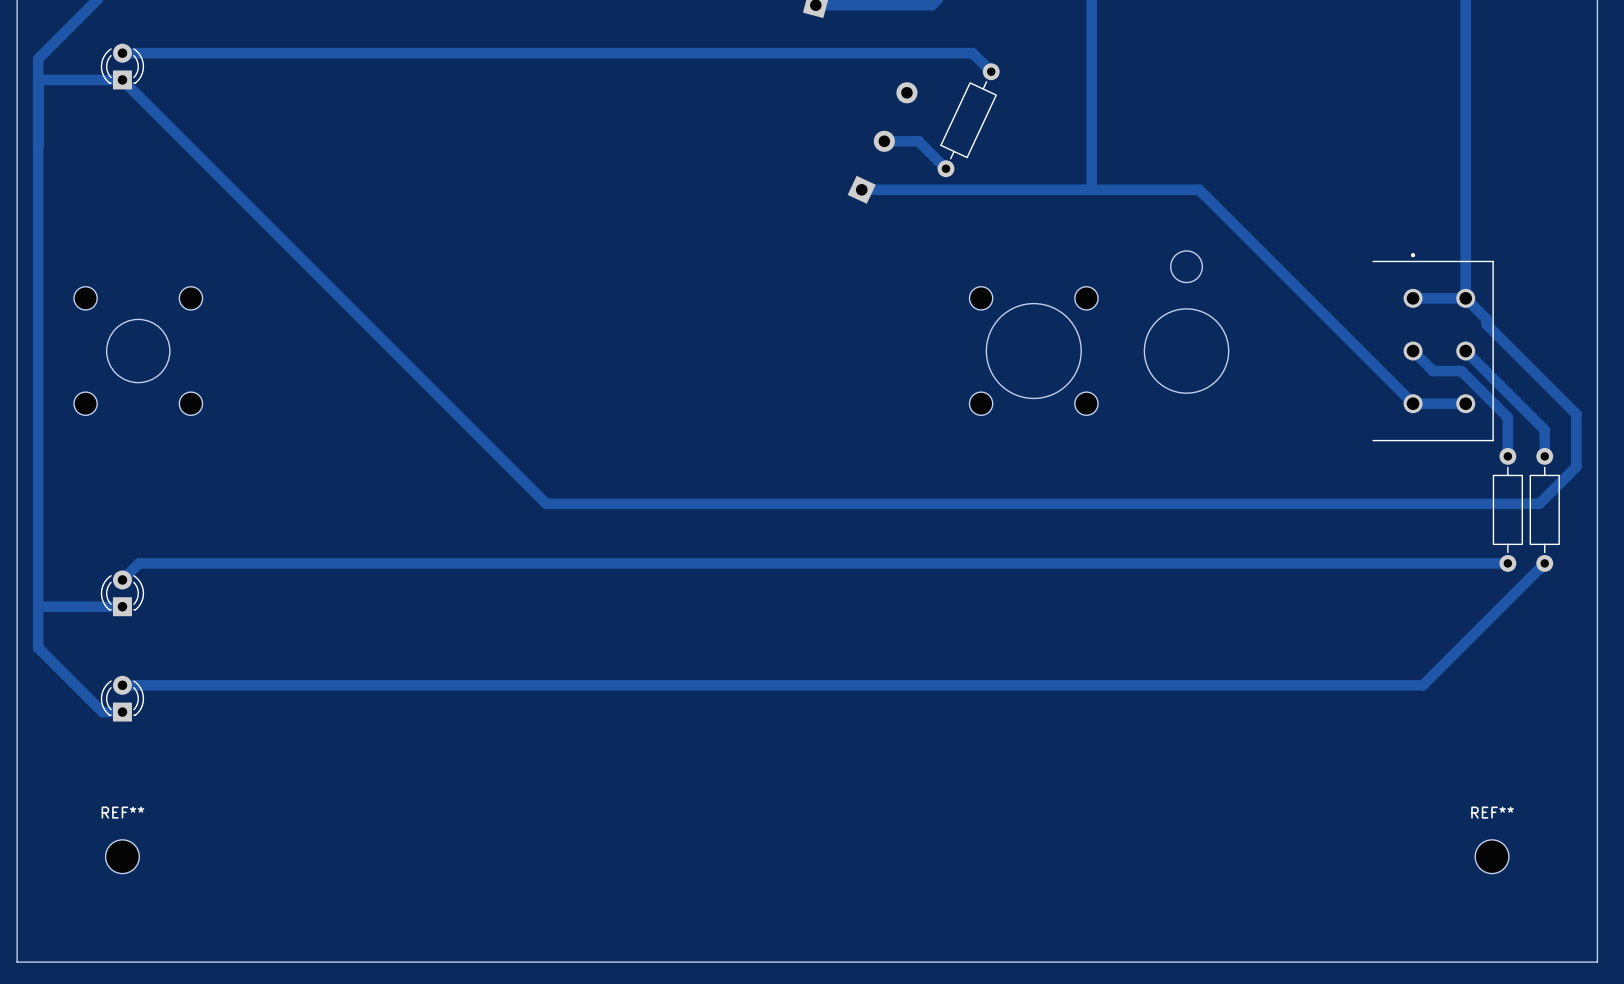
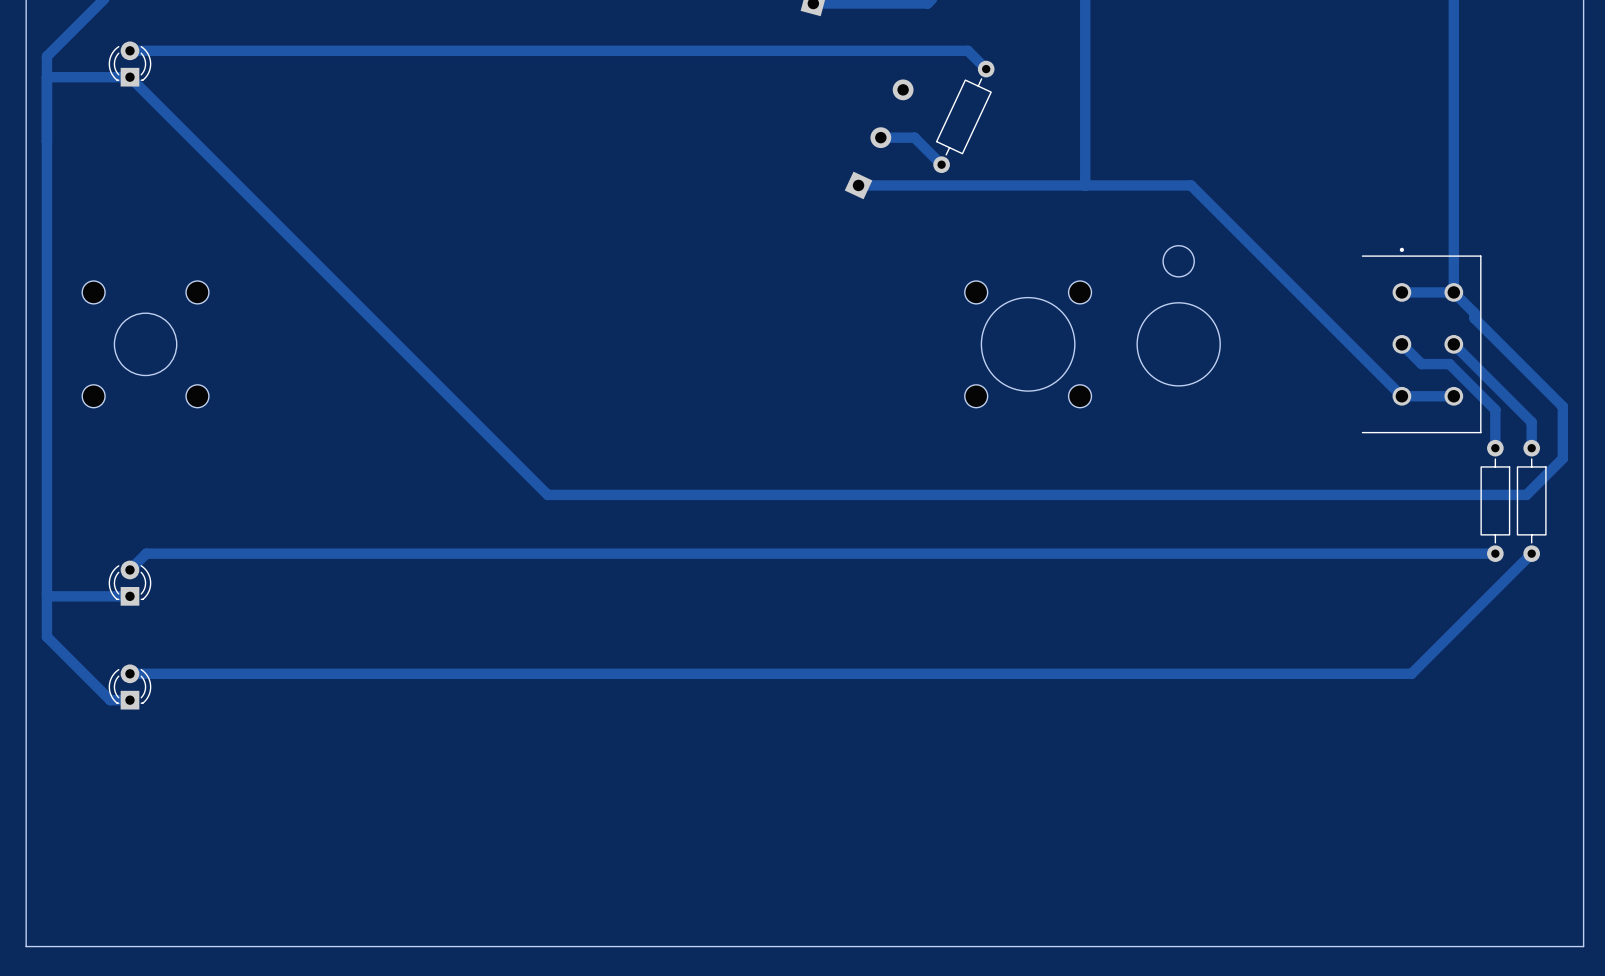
REF**: (122, 856) -> none
REF**: (1492, 856) -> none

